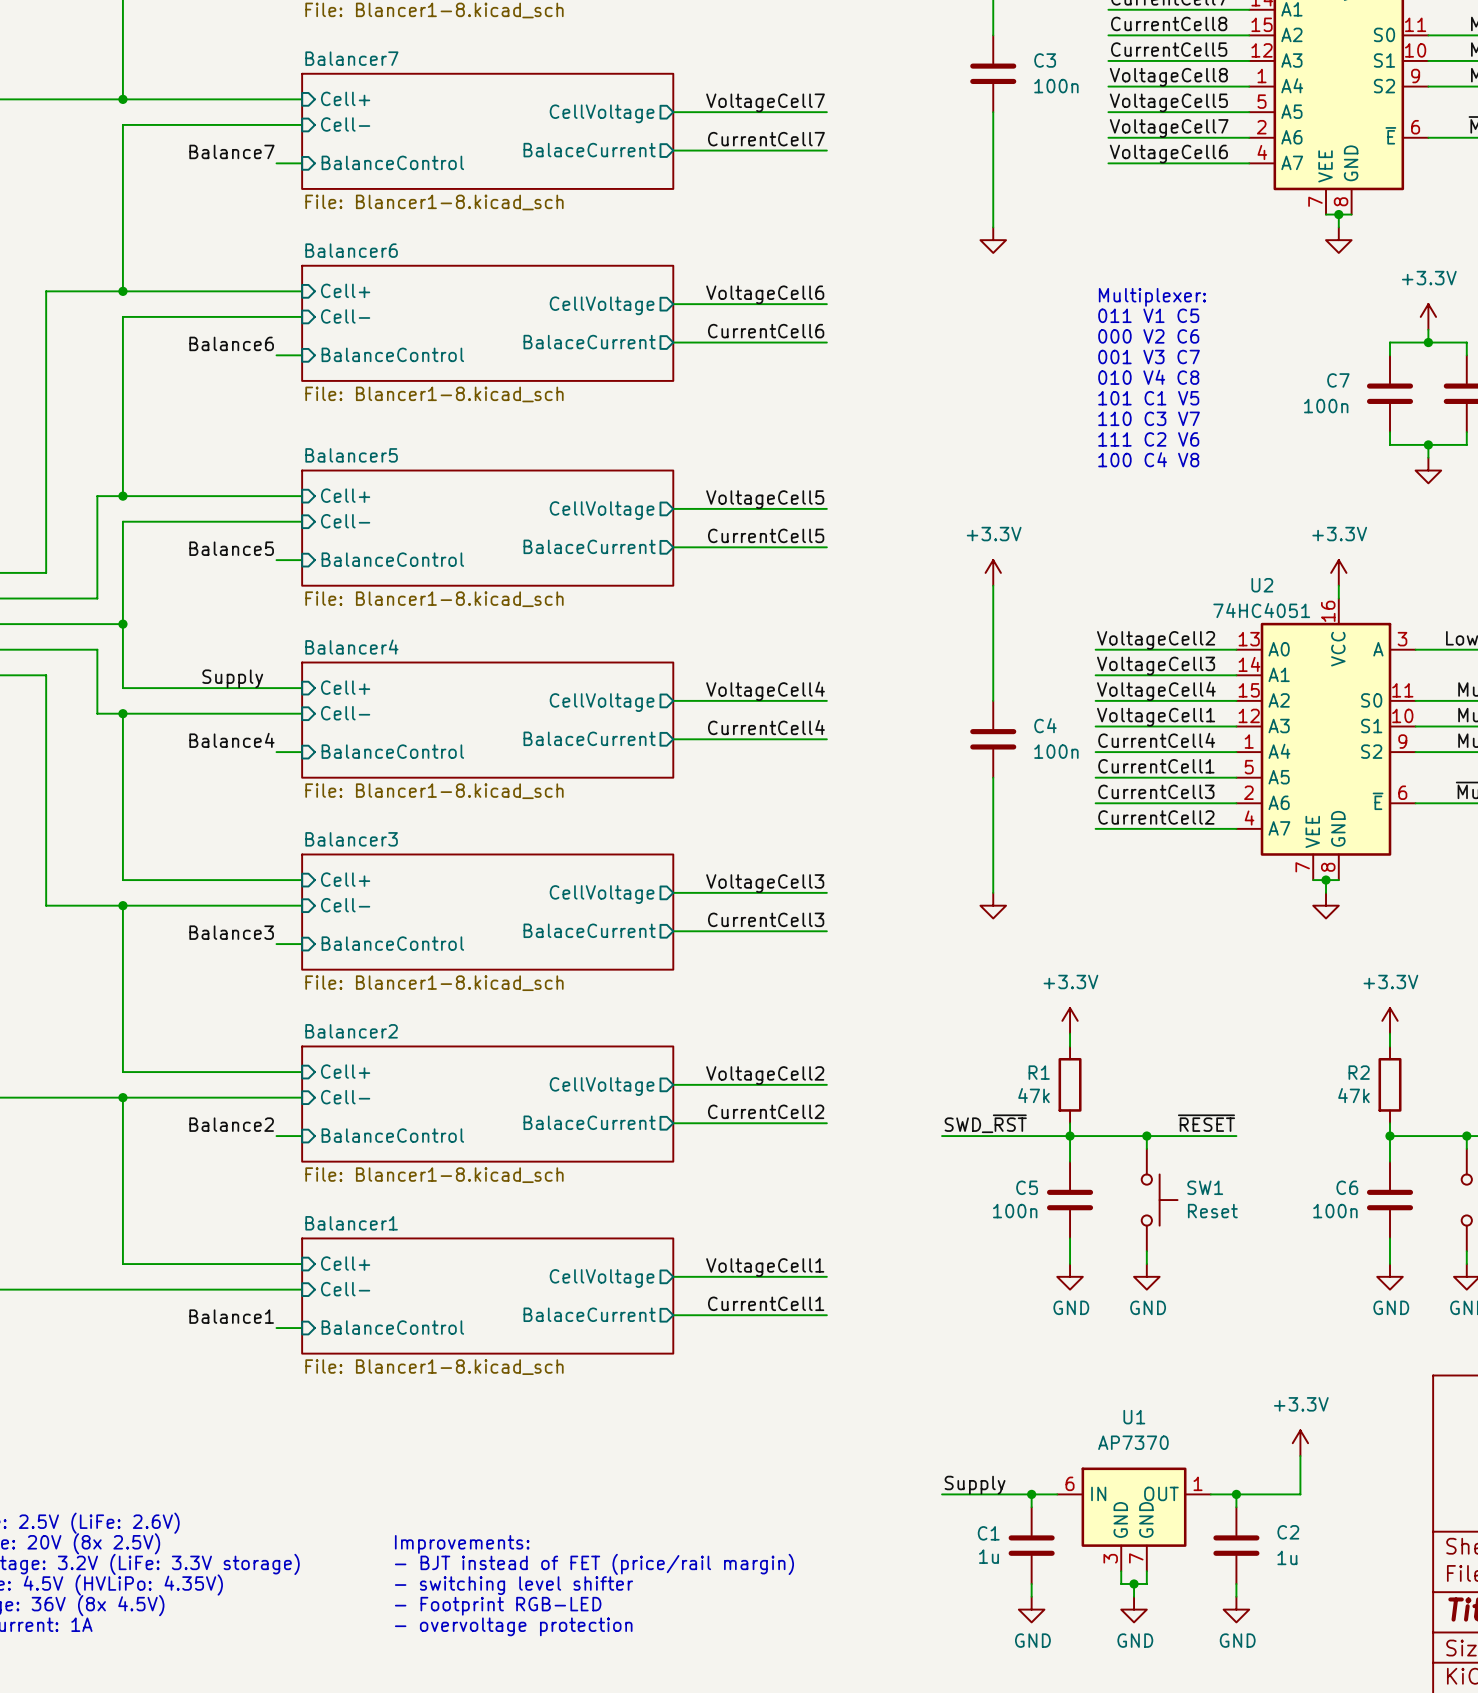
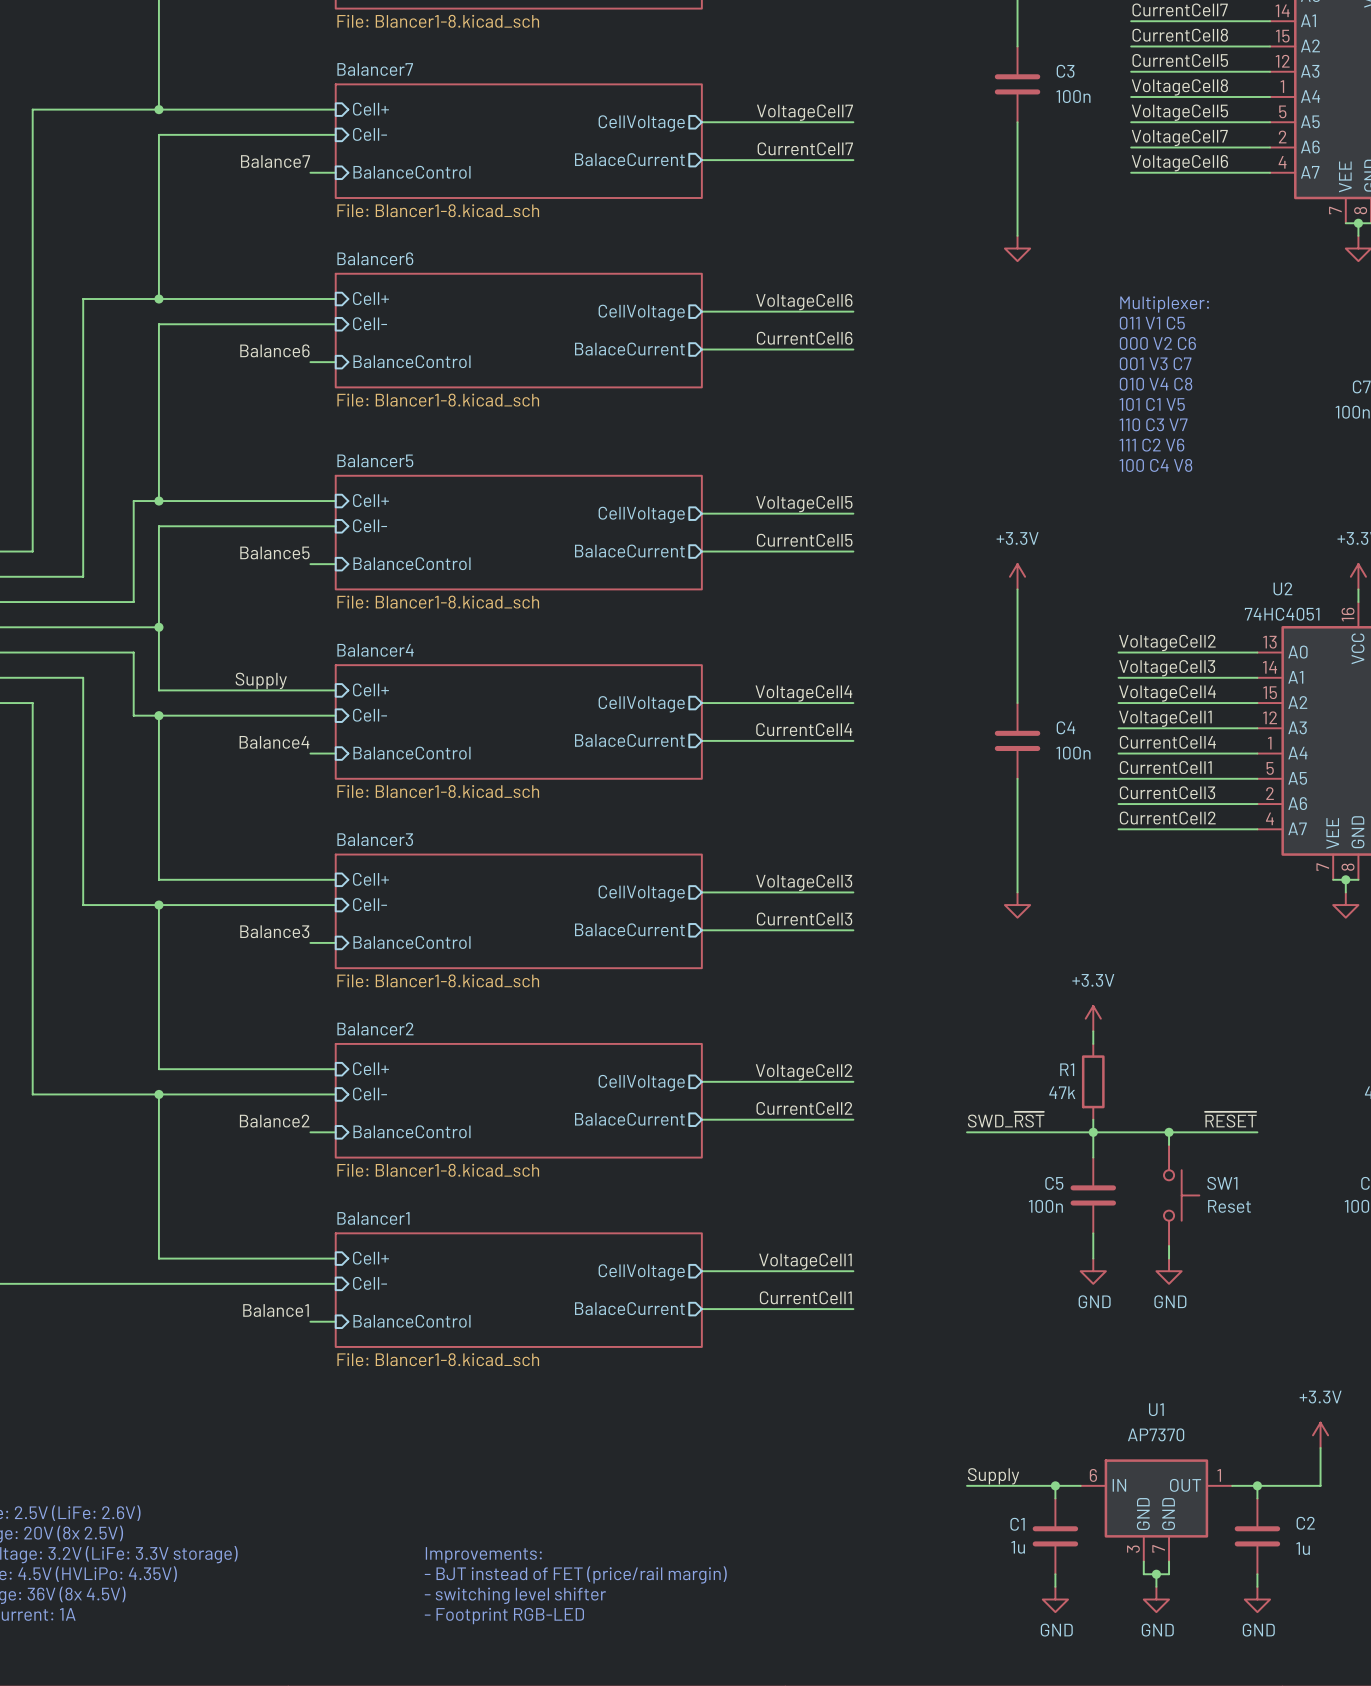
text: Improvements: (462, 1544) -> none
text: - BJT instead of FET (price/rail margin) (594, 1564) -> Improvements: (483, 1555)
text: - switching level shifter (514, 1585) -> - BJT instead of FET (price/rail margin) (575, 1574)
text: - Footprint RGB-LED (498, 1606) -> - switching level shifter (515, 1595)
text: - overvoltage protection (513, 1626) -> - Footprint RGB-LED (504, 1616)

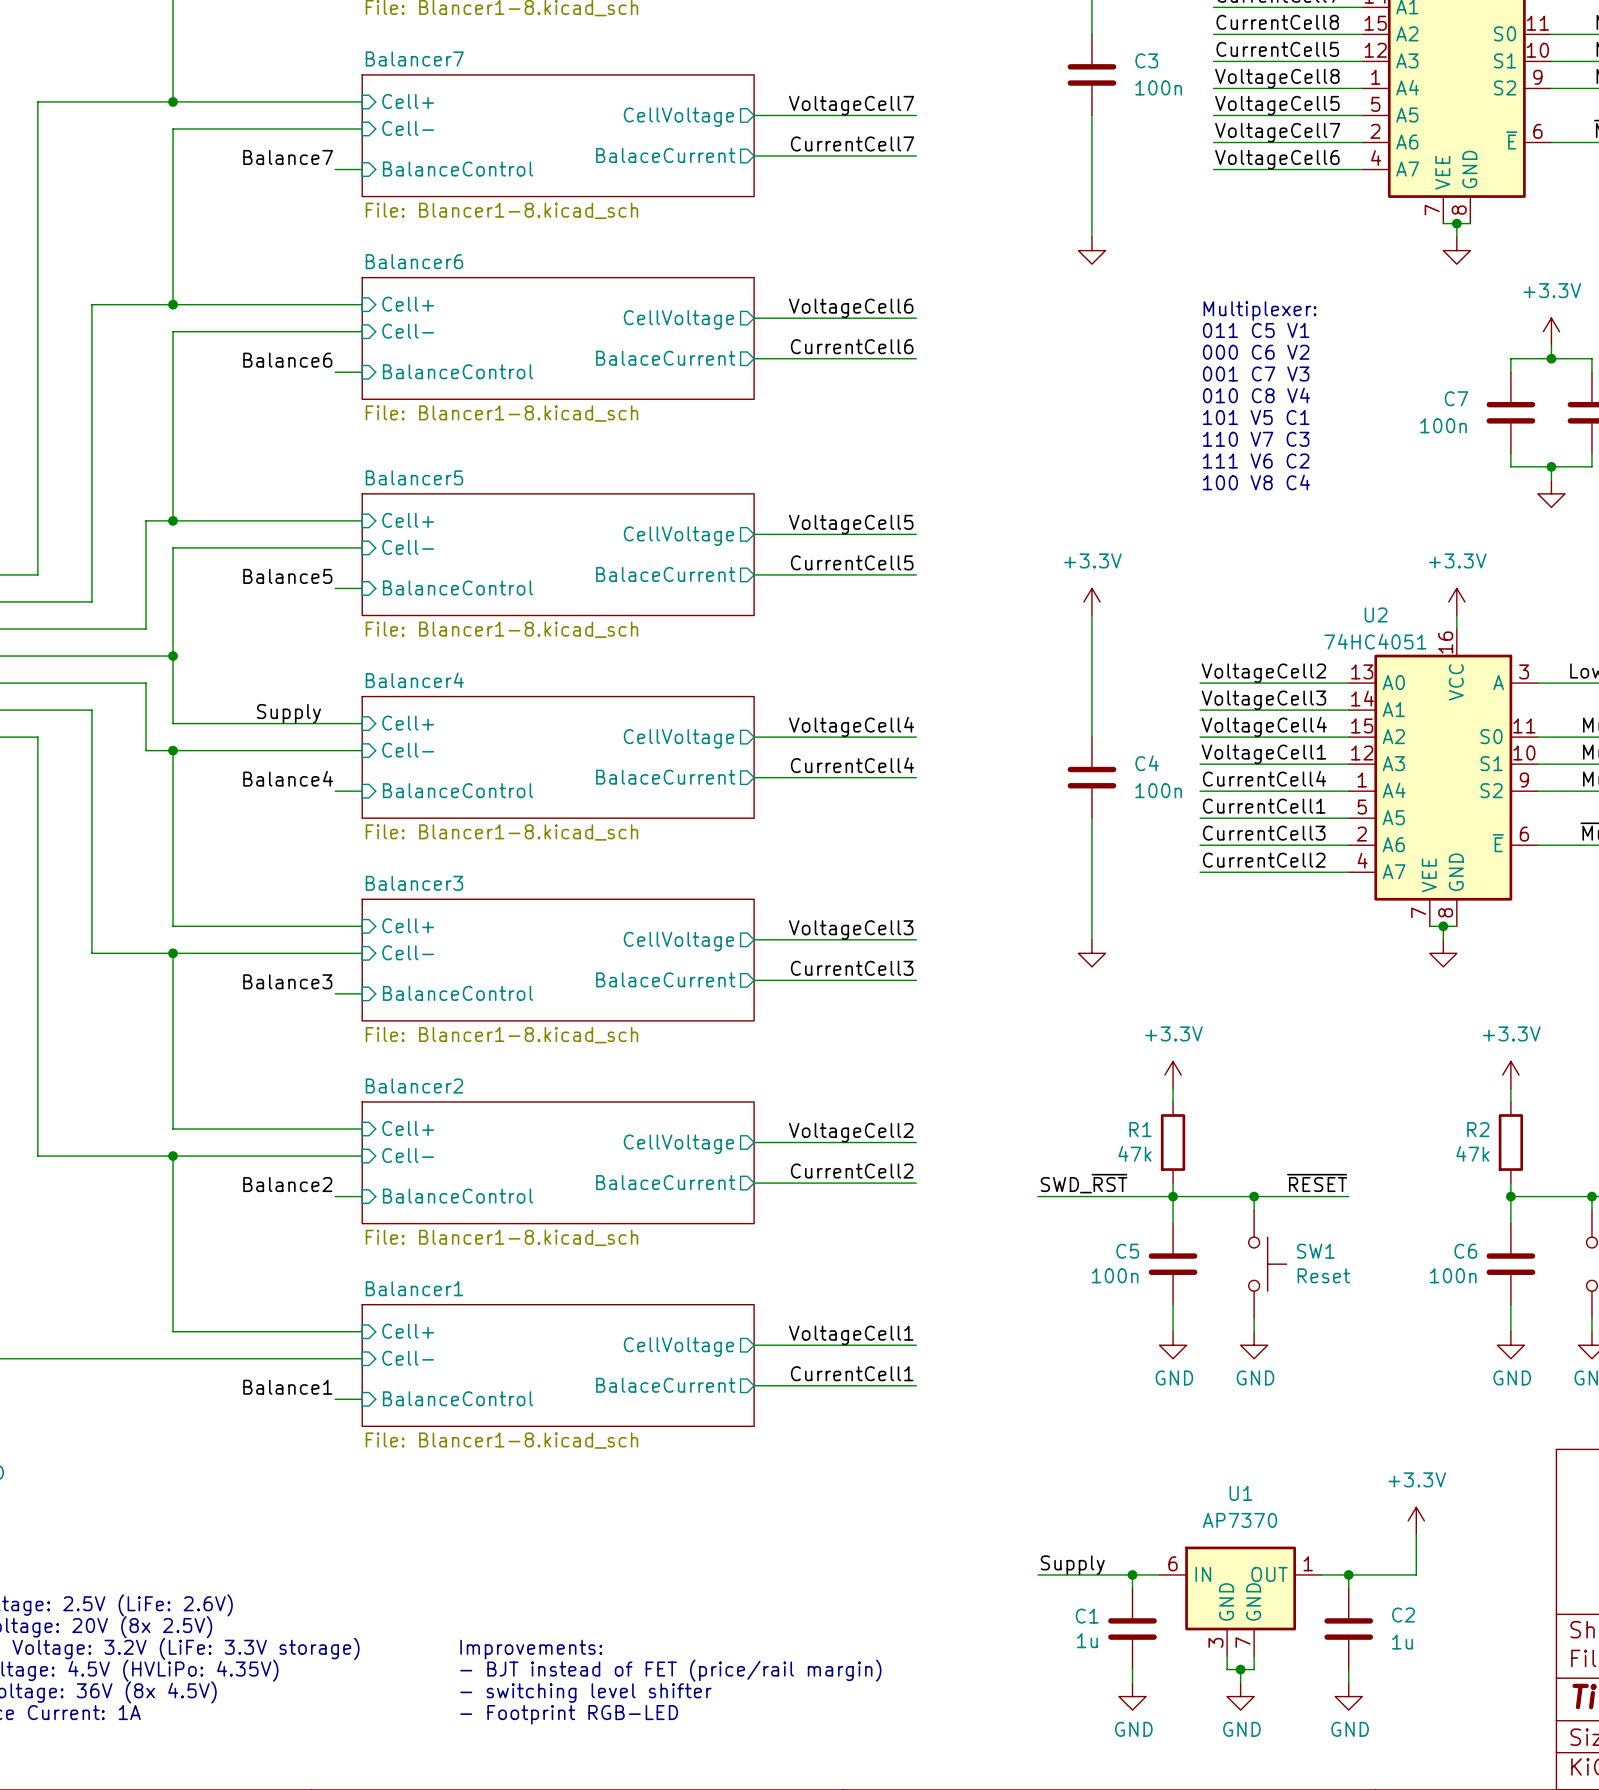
text: 011 V1 C5 (1152, 323) -> 011 C5 V1 (1256, 330)
text: 000 V2 C6 (1157, 343) -> 000 C6 V2 (1256, 352)
text: 001 V3 C7 (1155, 363) -> 001 C7 V3 (1256, 374)
text: 010 V4 C8 (1156, 384) -> 010 C8 V4 (1256, 395)
text: 101 C1 V5 (1152, 404) -> 101 V5 C1 (1256, 417)
text: 110 C3 V7 (1153, 424) -> 110 V7 C3 (1256, 439)
text: 111 C2 V6 (1151, 445) -> 111 V6 C2 (1256, 461)
text: 100 C4 V8 (1155, 465) -> 100 V8 C4 (1256, 482)

